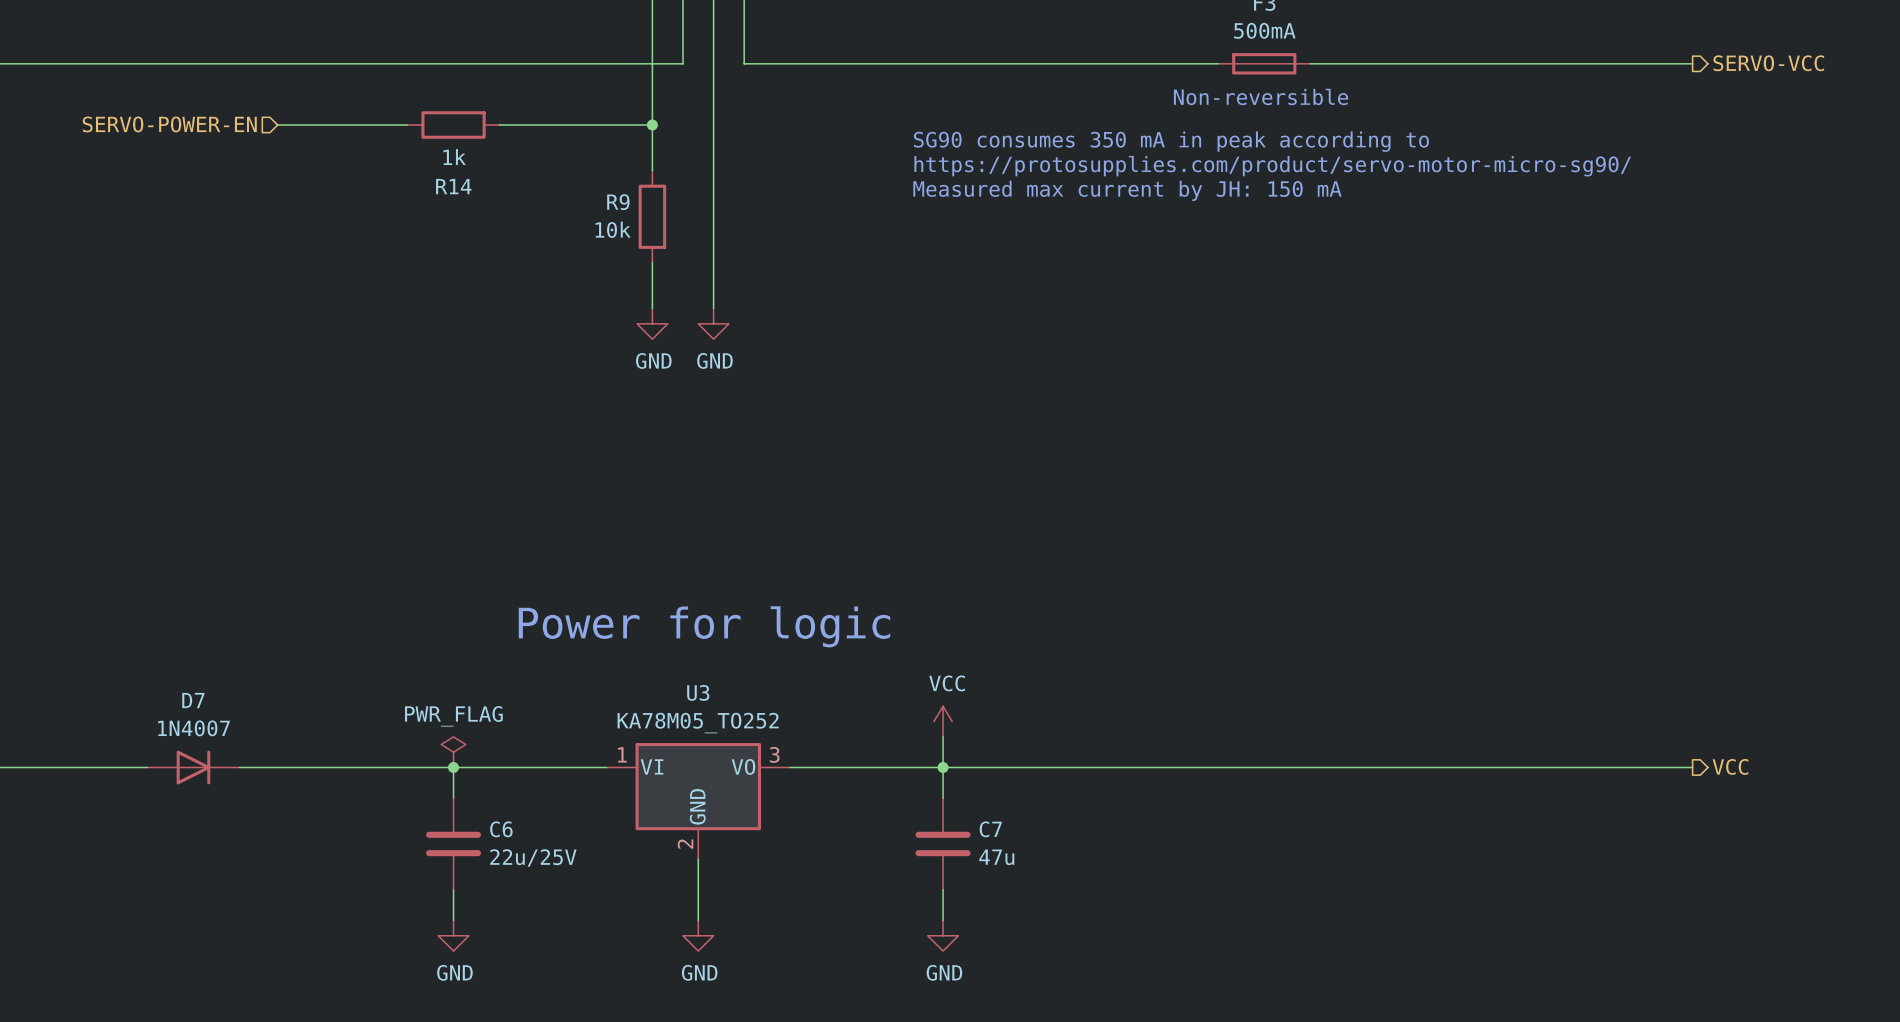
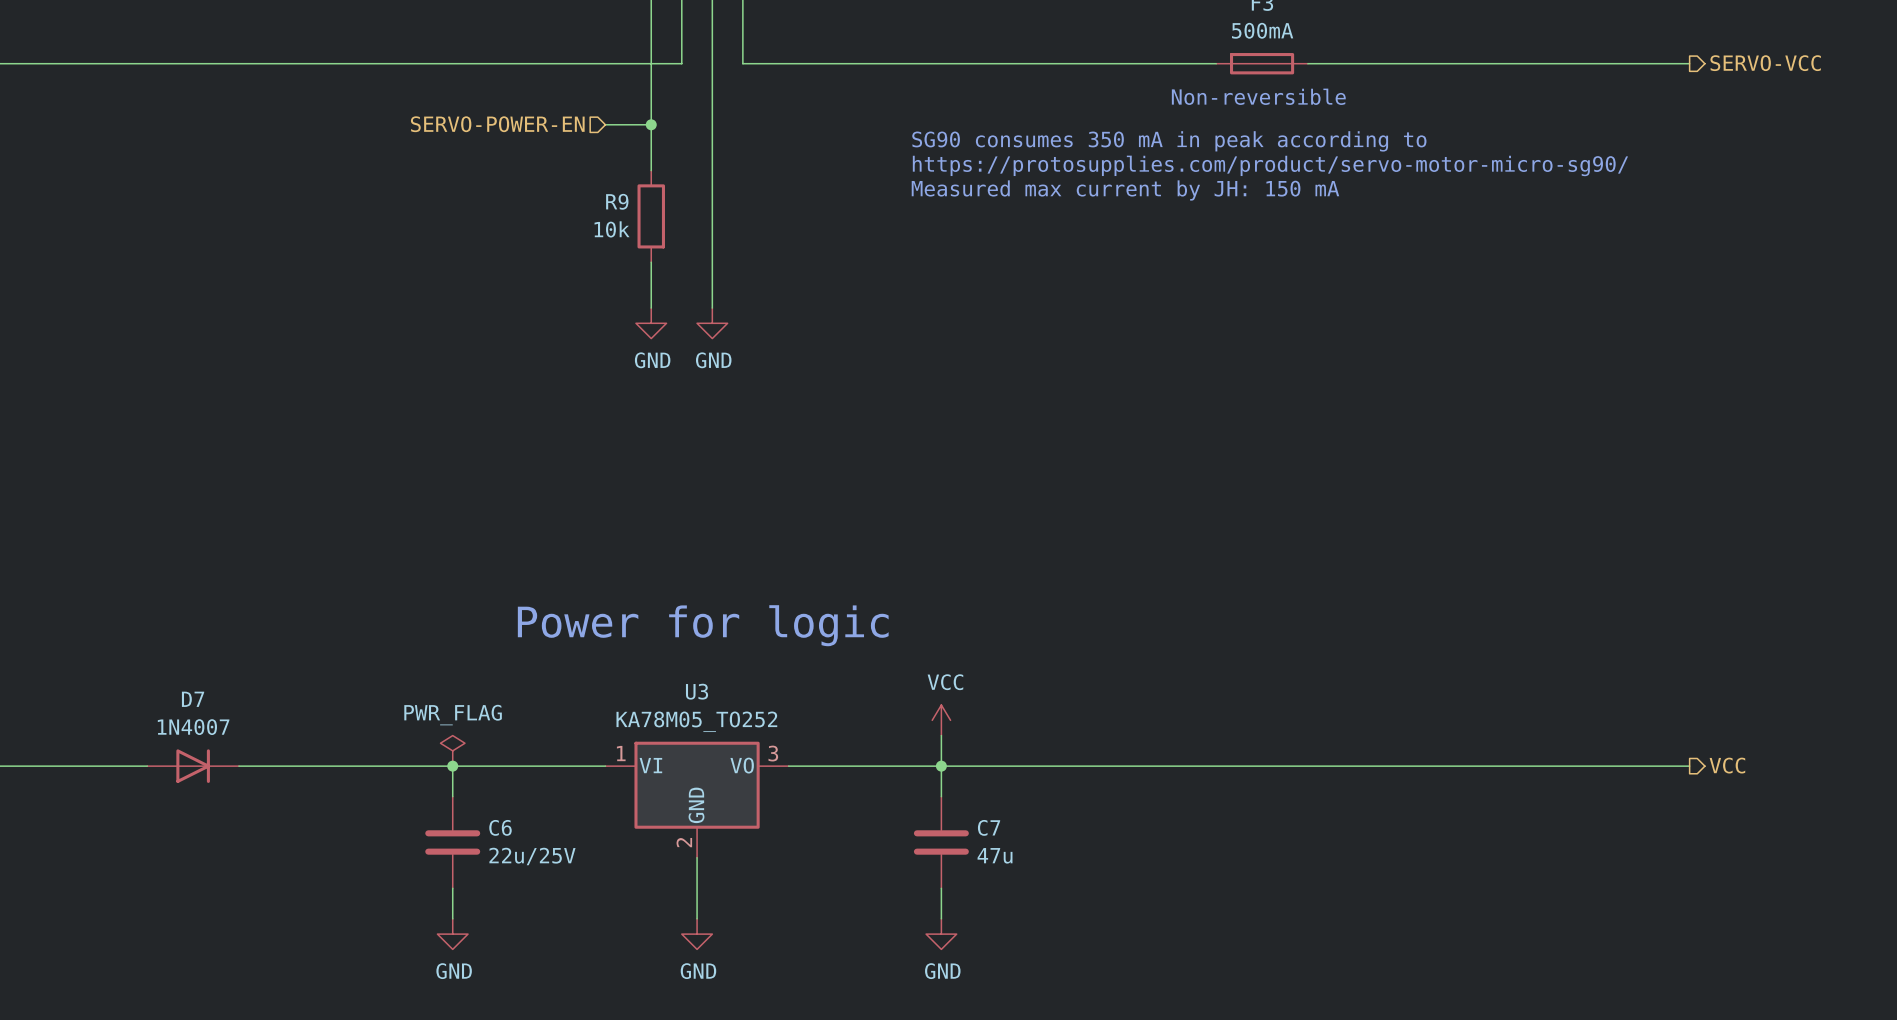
hierarchical label: SERVO-POWER-EN (169, 124) -> none
hierarchical label: none -> SERVO-POWER-EN (497, 124)
wire: (277, 125) (407, 125) -> none
R14: 1k (453, 125) -> none
wire: (499, 125) (606, 125) -> none

